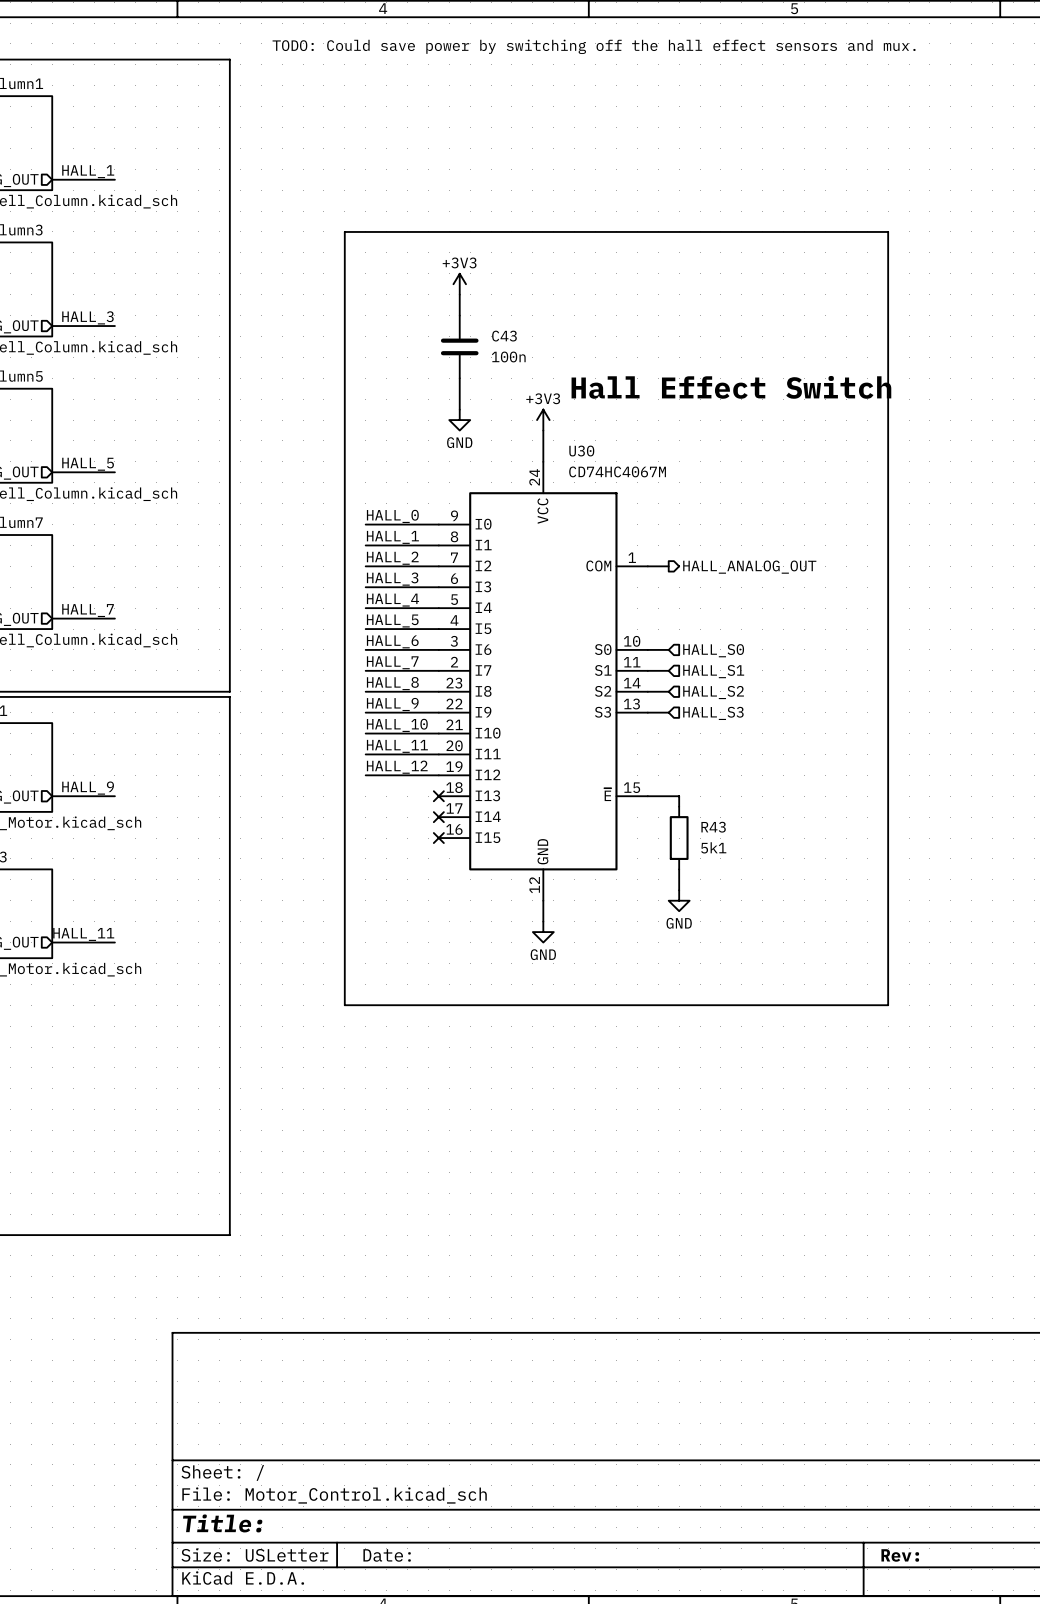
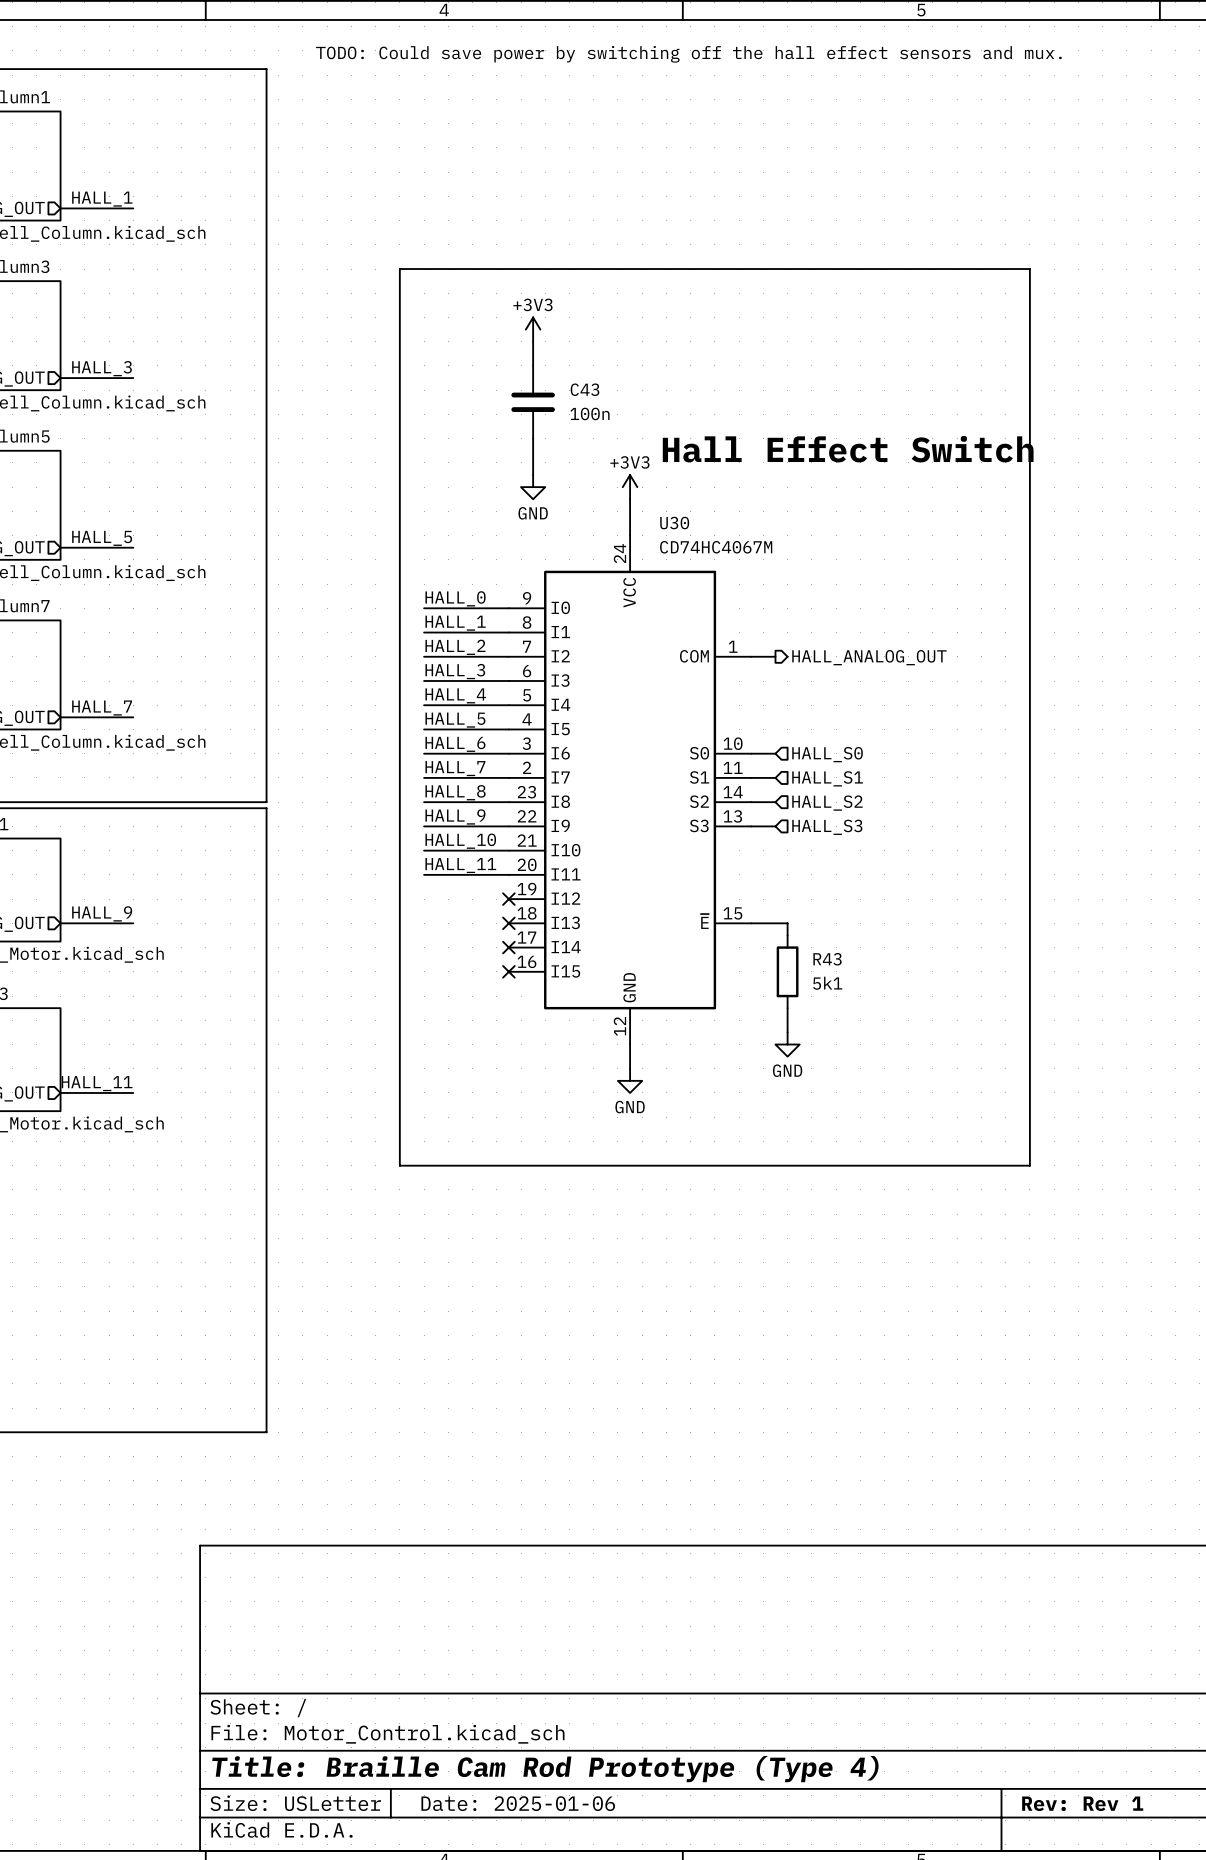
label: HALL_12 (397, 767) -> none
wire: (365, 775) (438, 775) -> none
no-connect mark: none -> (508, 899)
title block: Title: (222, 1523) -> Title: Braille Cam Rod Prototype (Type 4) (545, 1769)
title block: Date: (387, 1555) -> Date: 2025-01-06 (518, 1803)
title block: Rev: (900, 1555) -> Rev: Rev 1 (1082, 1803)

